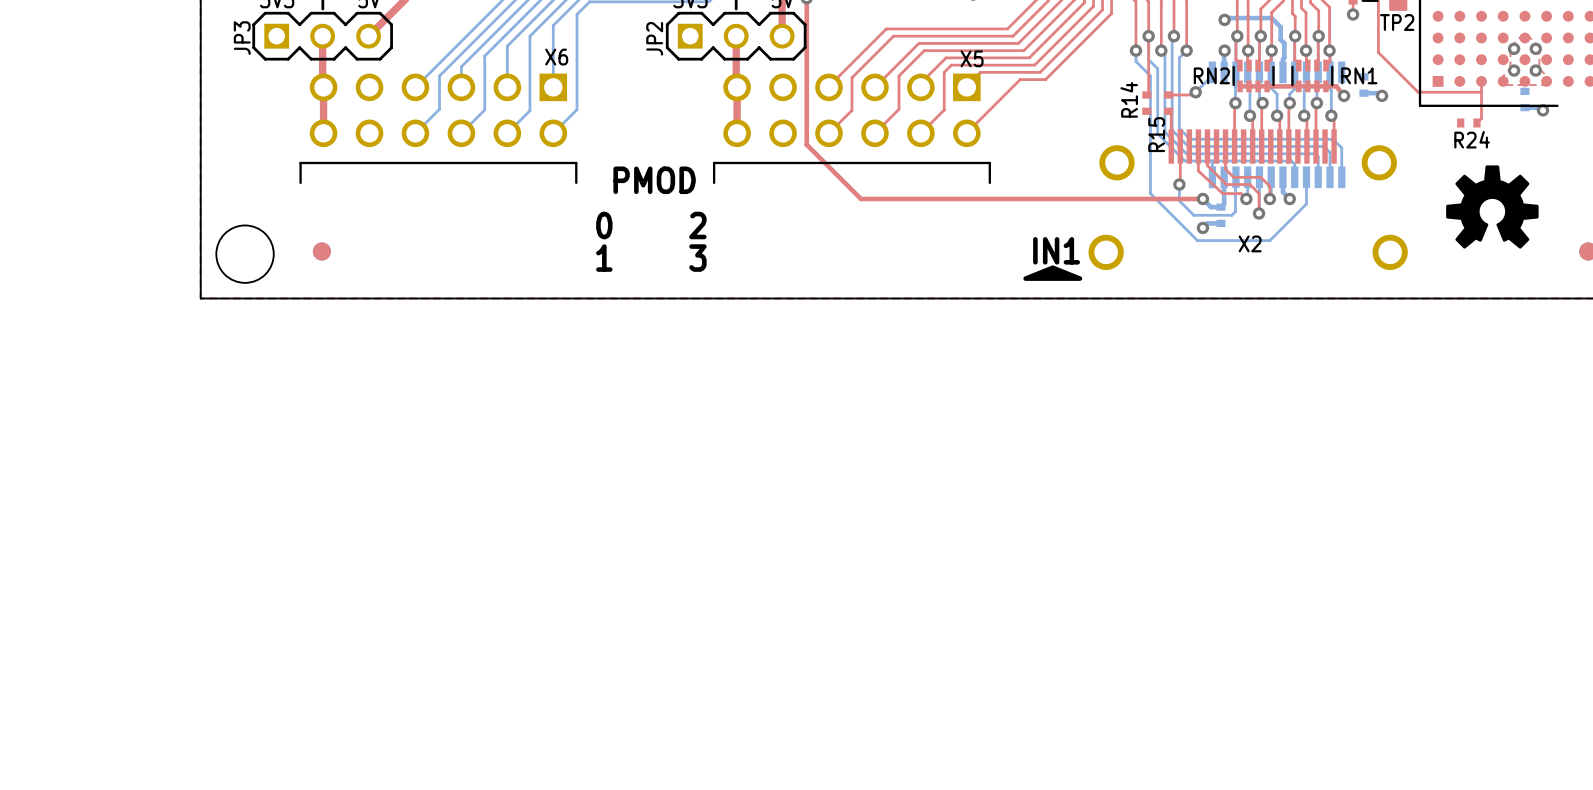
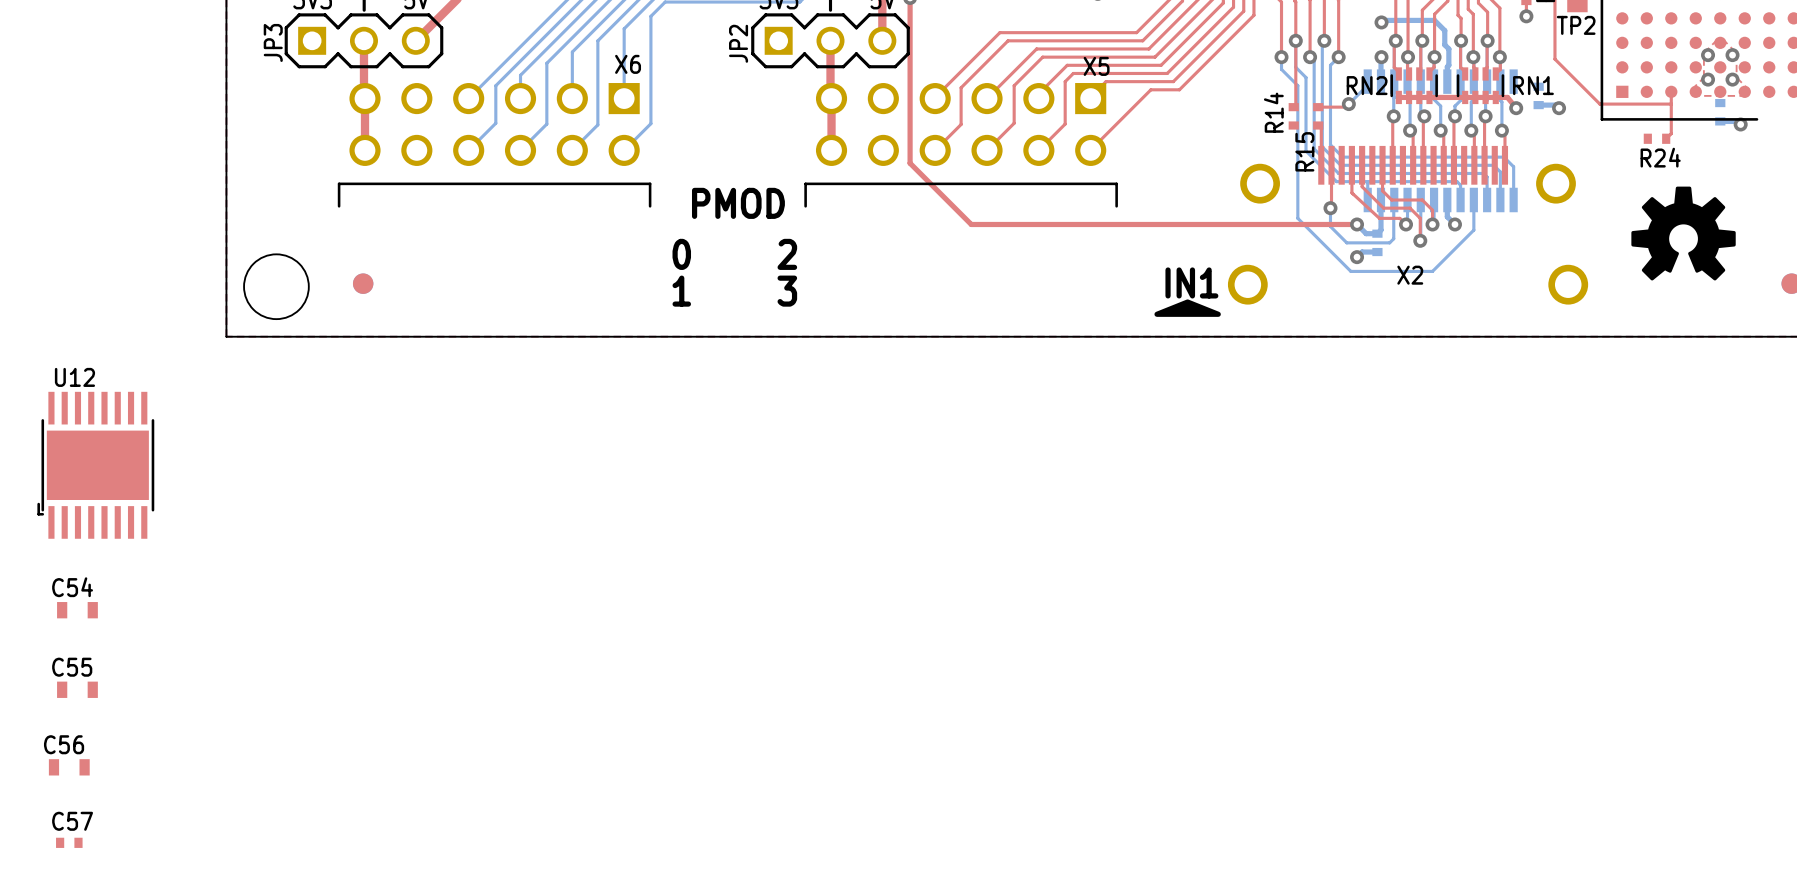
U12: none -> (95, 465)
C54: none -> (77, 610)
C55: none -> (77, 689)
C56: none -> (69, 767)
C57: none -> (69, 842)

